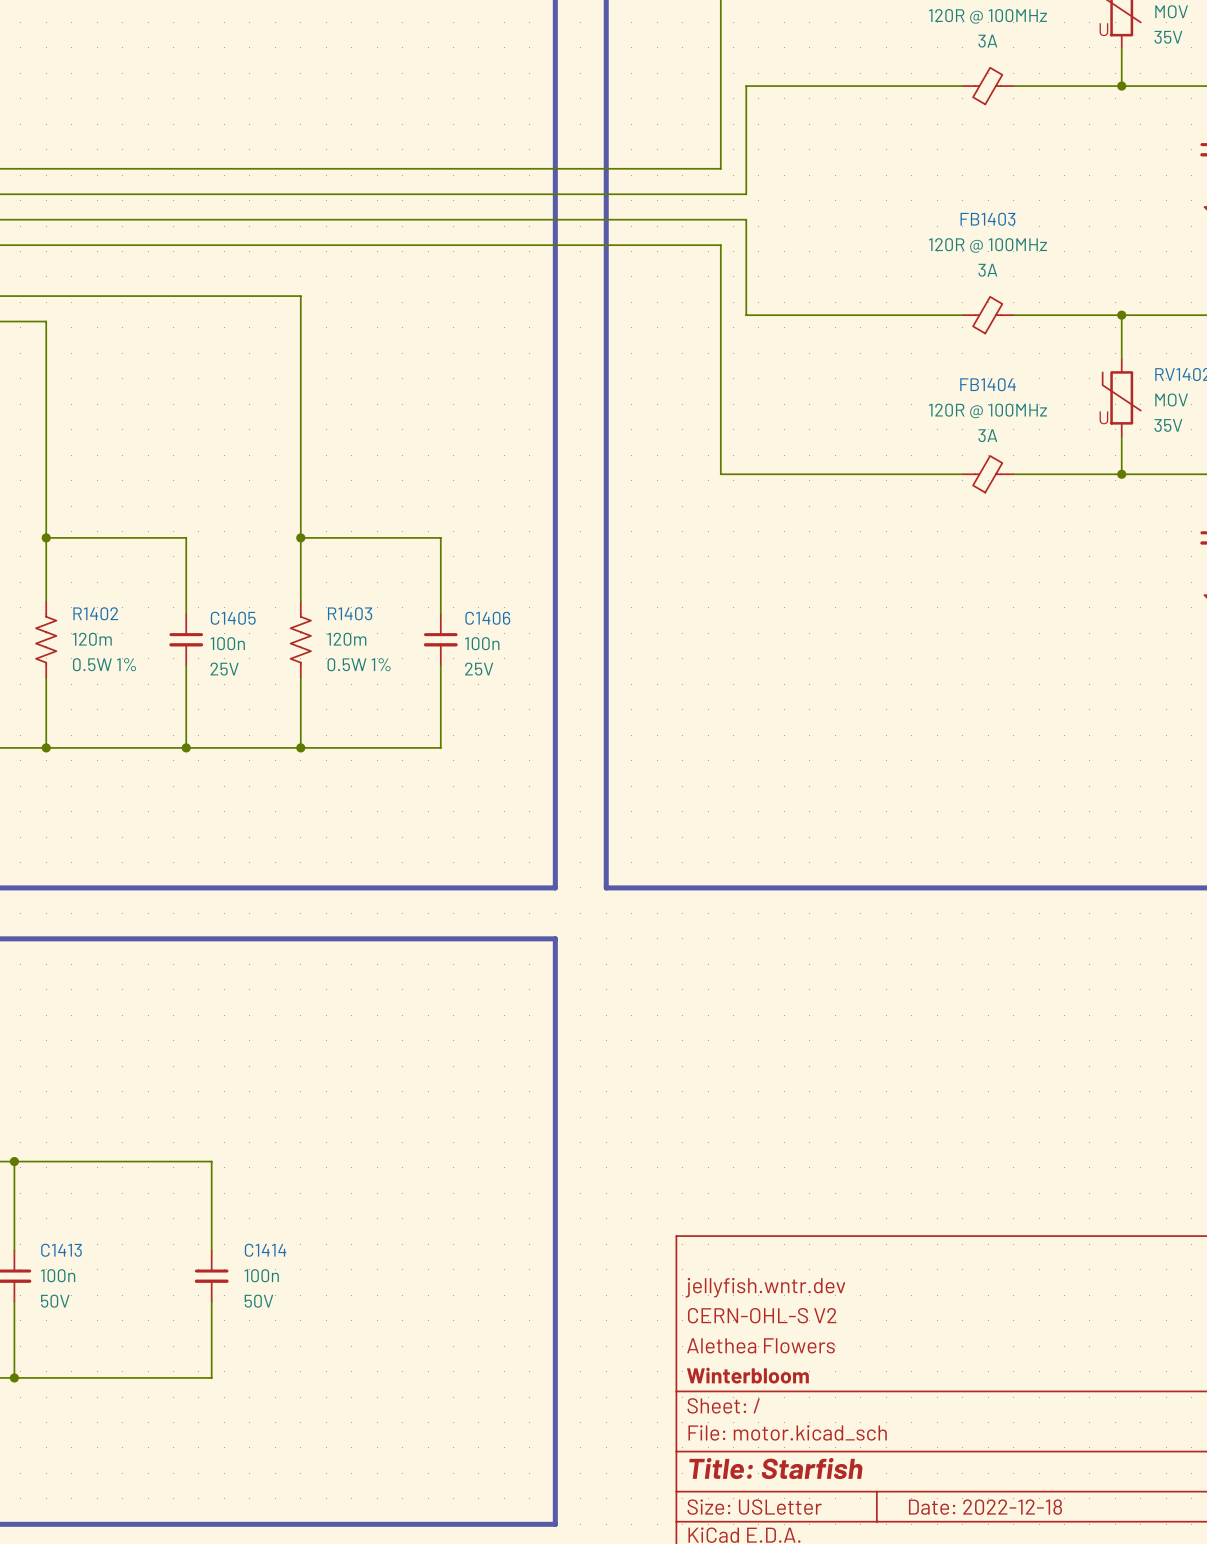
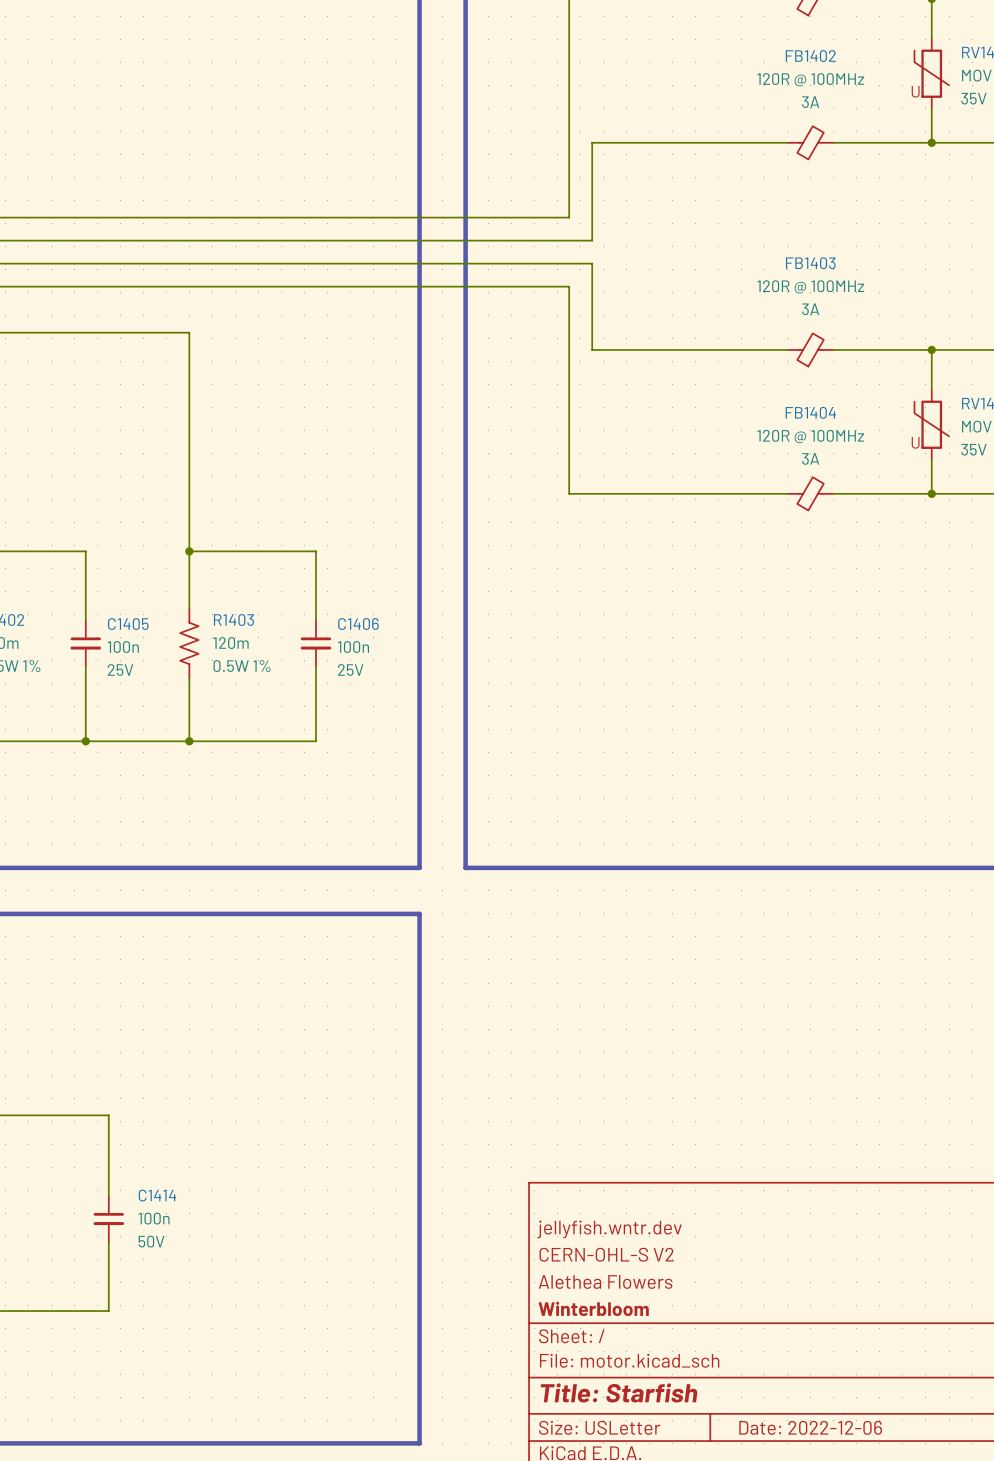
title block: Date: 2022-12-18 (985, 1507) -> Date: 2022-12-06 (810, 1427)

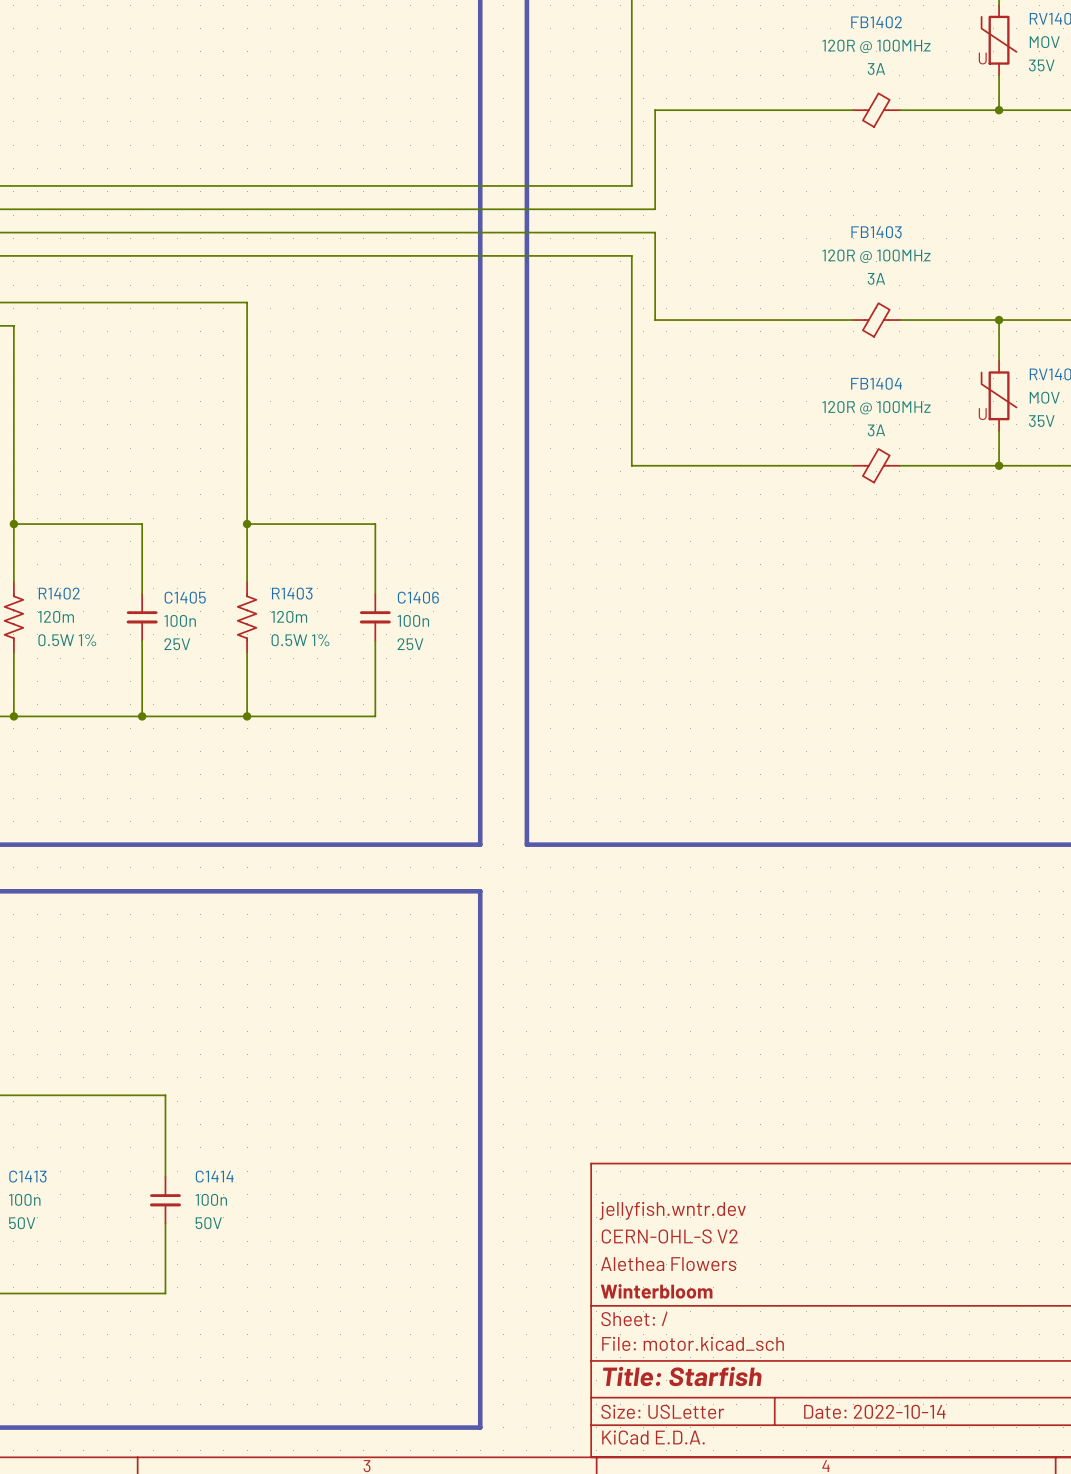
title block: Date: 2022-12-06 (810, 1427) -> Date: 2022-10-14 (874, 1411)

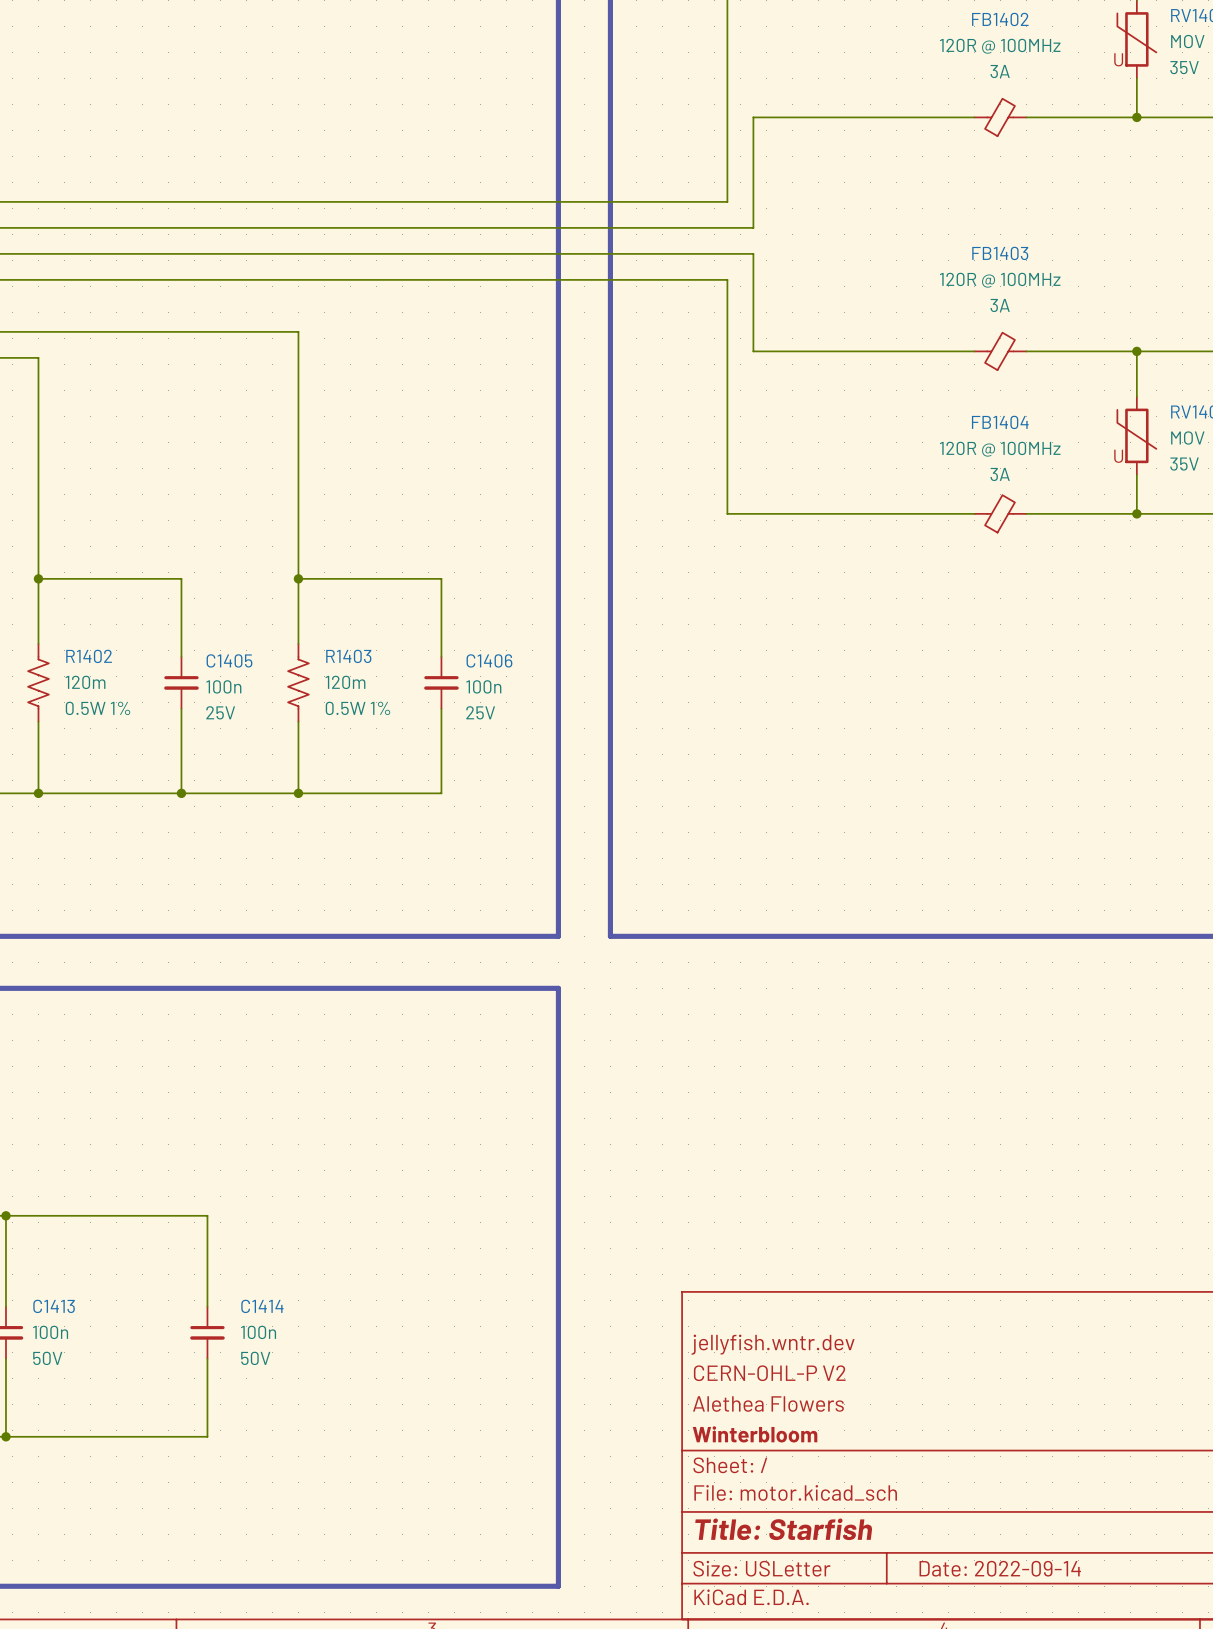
title block: CERN-OHL-S V2 (669, 1236) -> CERN-OHL-P V2 (769, 1373)
title block: Date: 2022-10-14 (874, 1411) -> Date: 2022-09-14 (1000, 1568)

